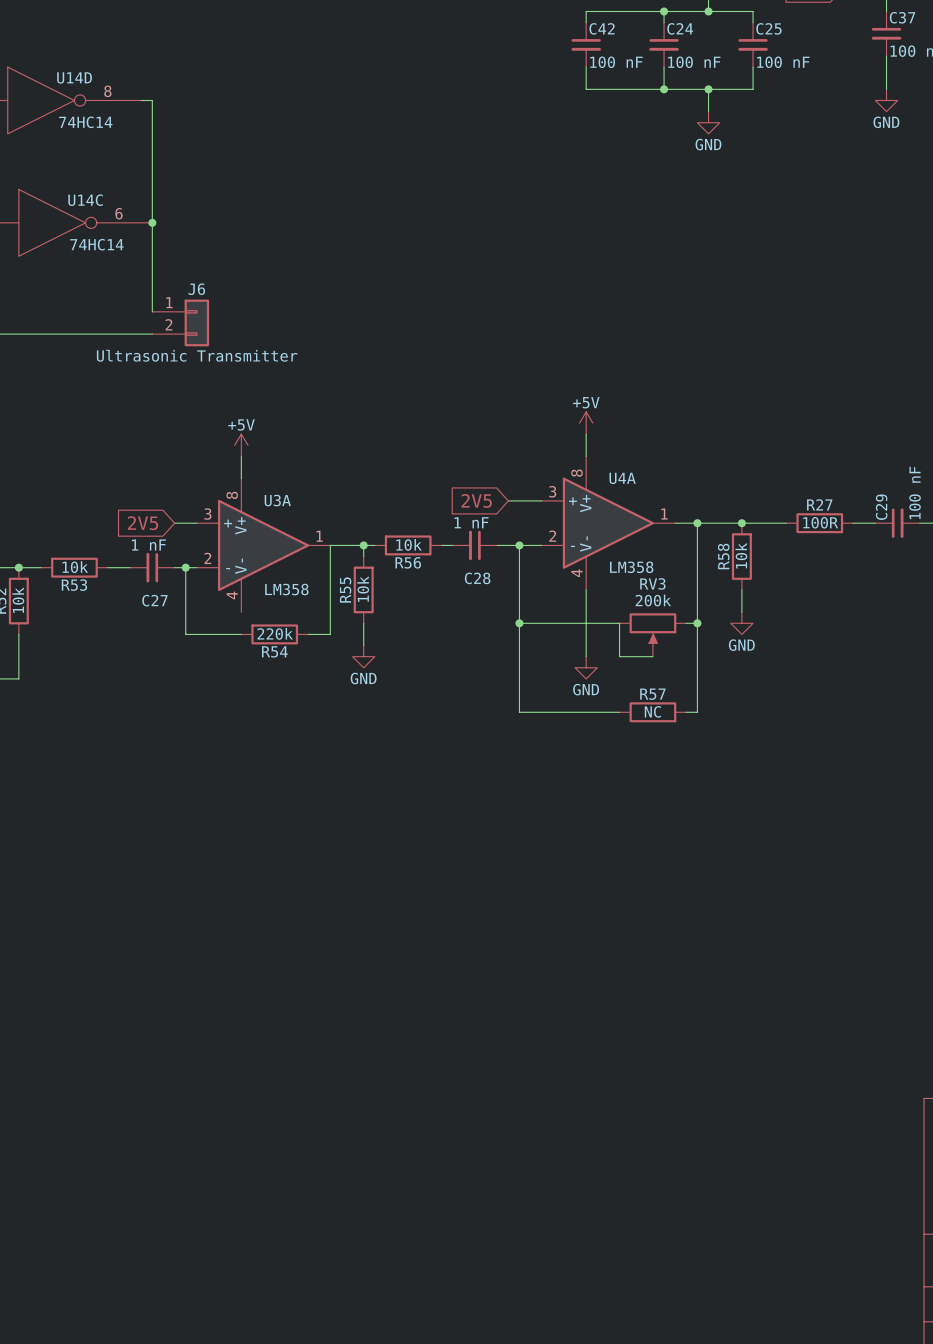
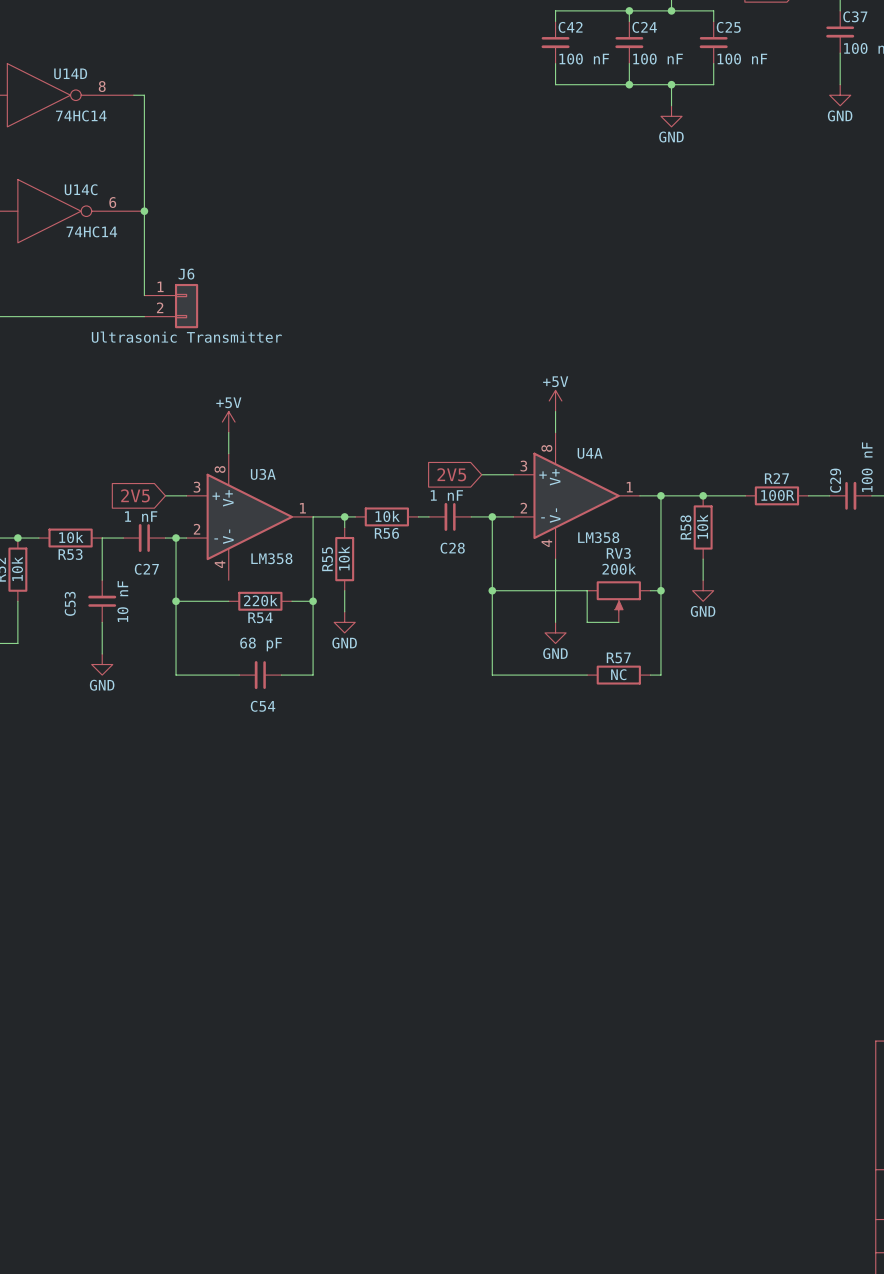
wire: none -> (102, 538) (102, 580)
C53: none -> 10 nF (102, 601)
wire: none -> (176, 601) (176, 675) (239, 675)
junction: none -> (176, 601)
wire: none -> (313, 601) (313, 675) (281, 675)
junction: none -> (313, 601)
wire: none -> (102, 622) (102, 653)
power symbol: none -> GND (102, 664)
C54: none -> 68 pF (260, 675)

